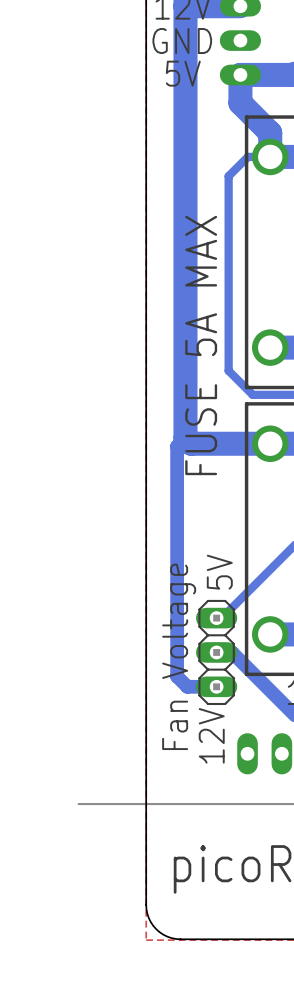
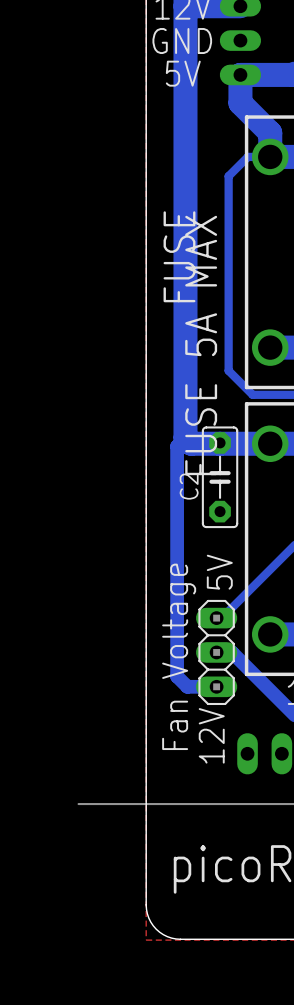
text: none -> FUSE (179, 256)
C2: none -> (220, 477)

